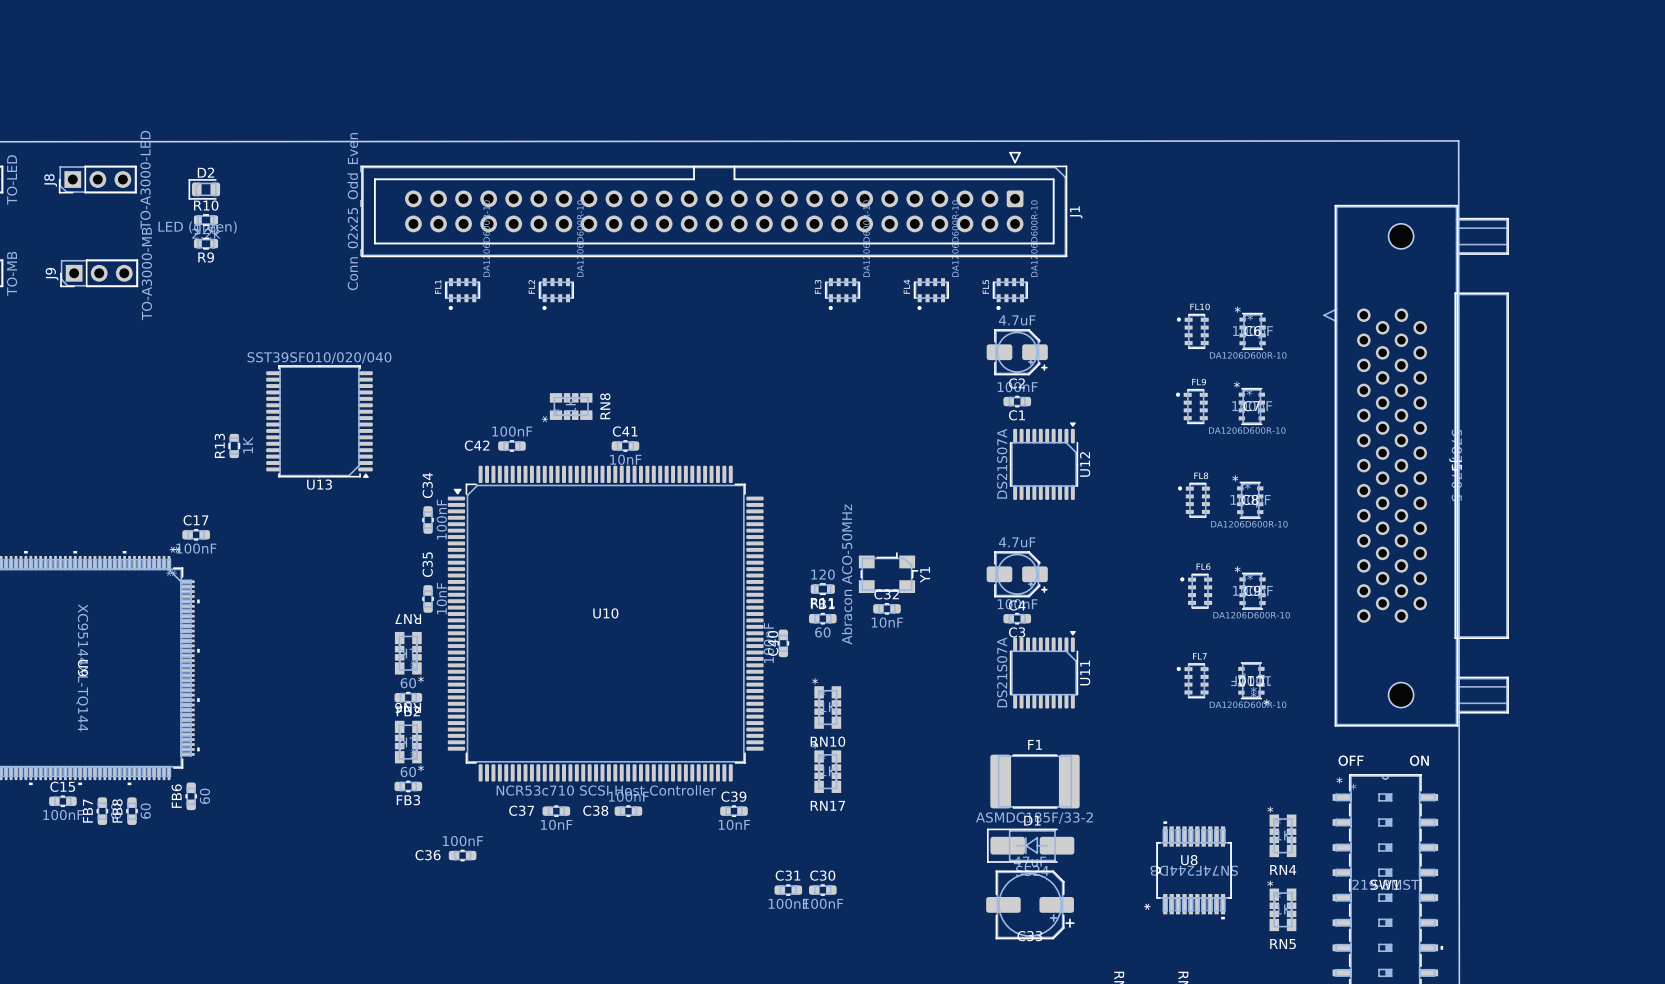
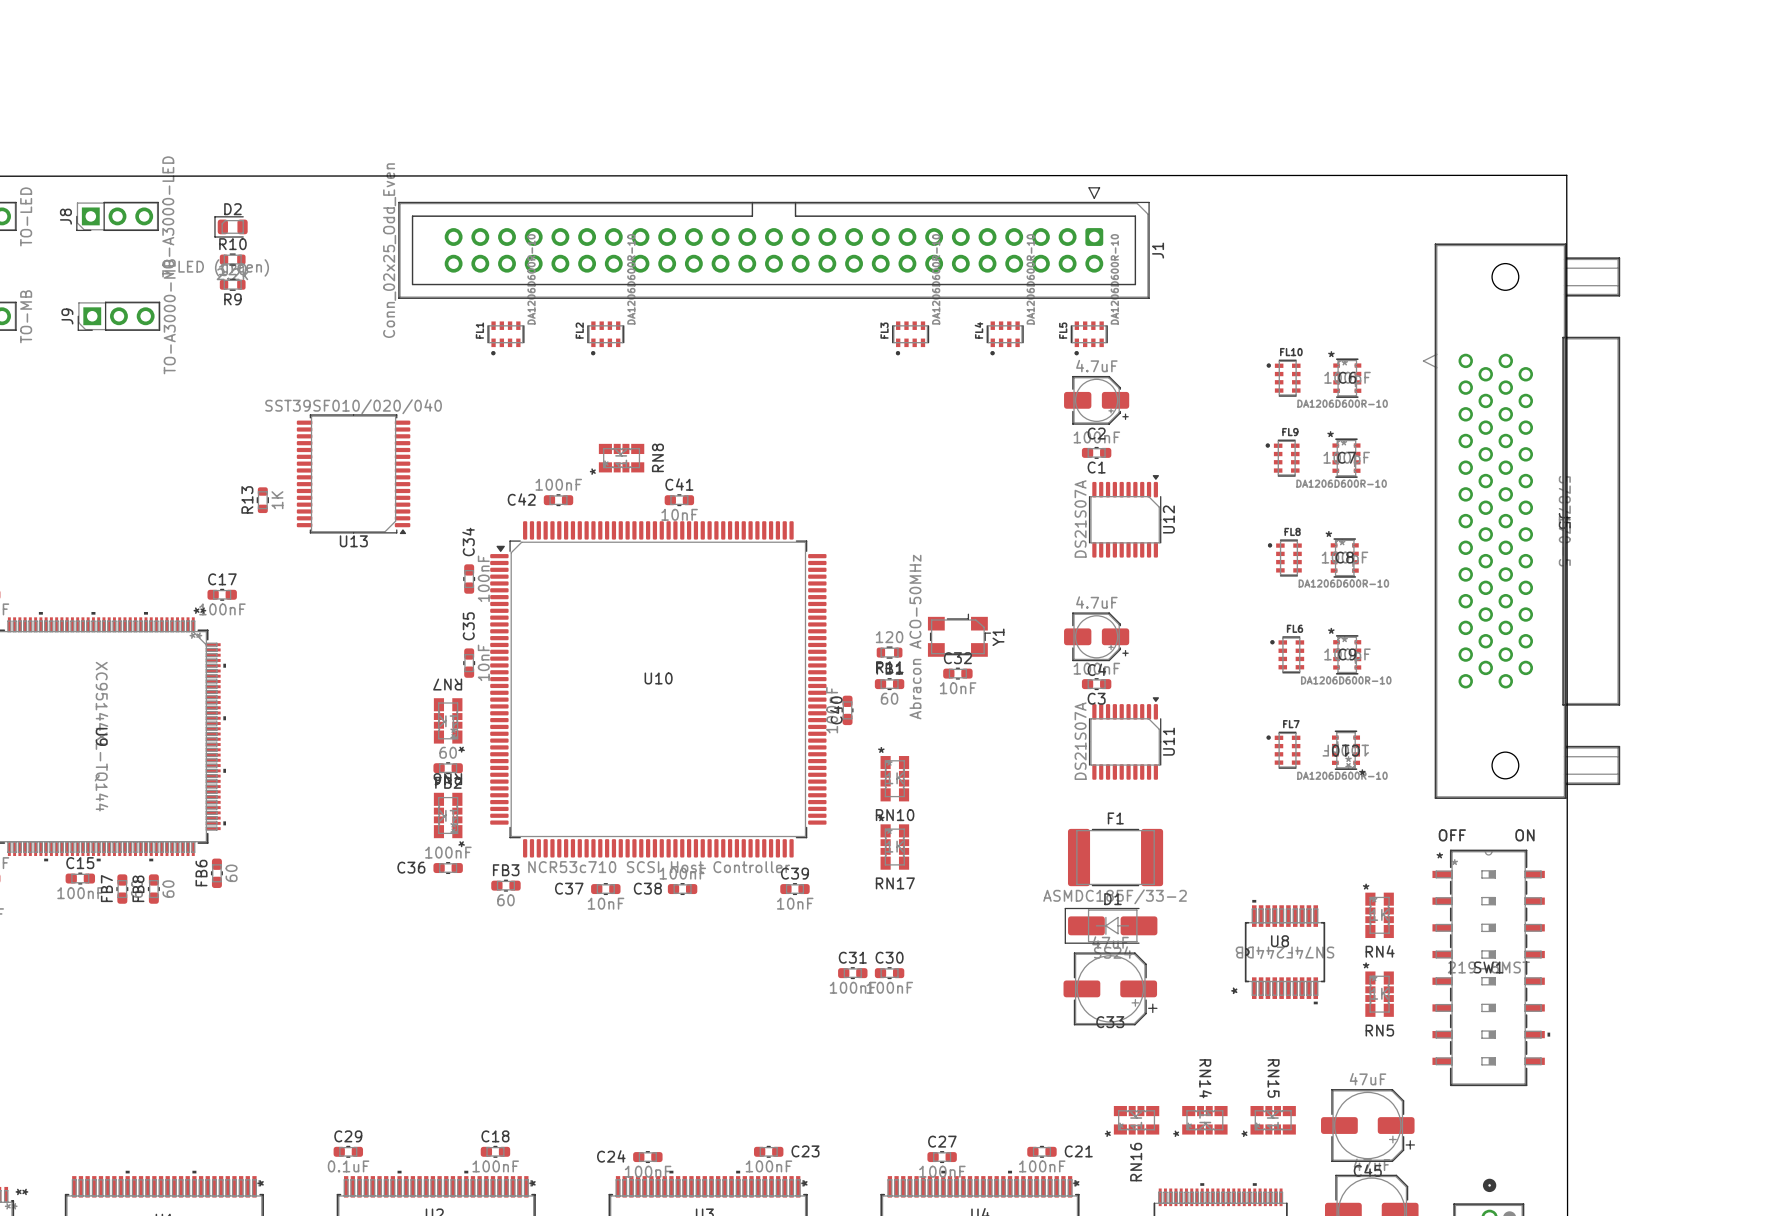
FB3 value position: 60 (408, 771) -> 60 (505, 900)
FB3 position: (408, 786) -> (505, 885)
FB3 name position: FB3 (408, 800) -> FB3 (506, 870)
C36 position: (462, 855) -> (448, 868)

